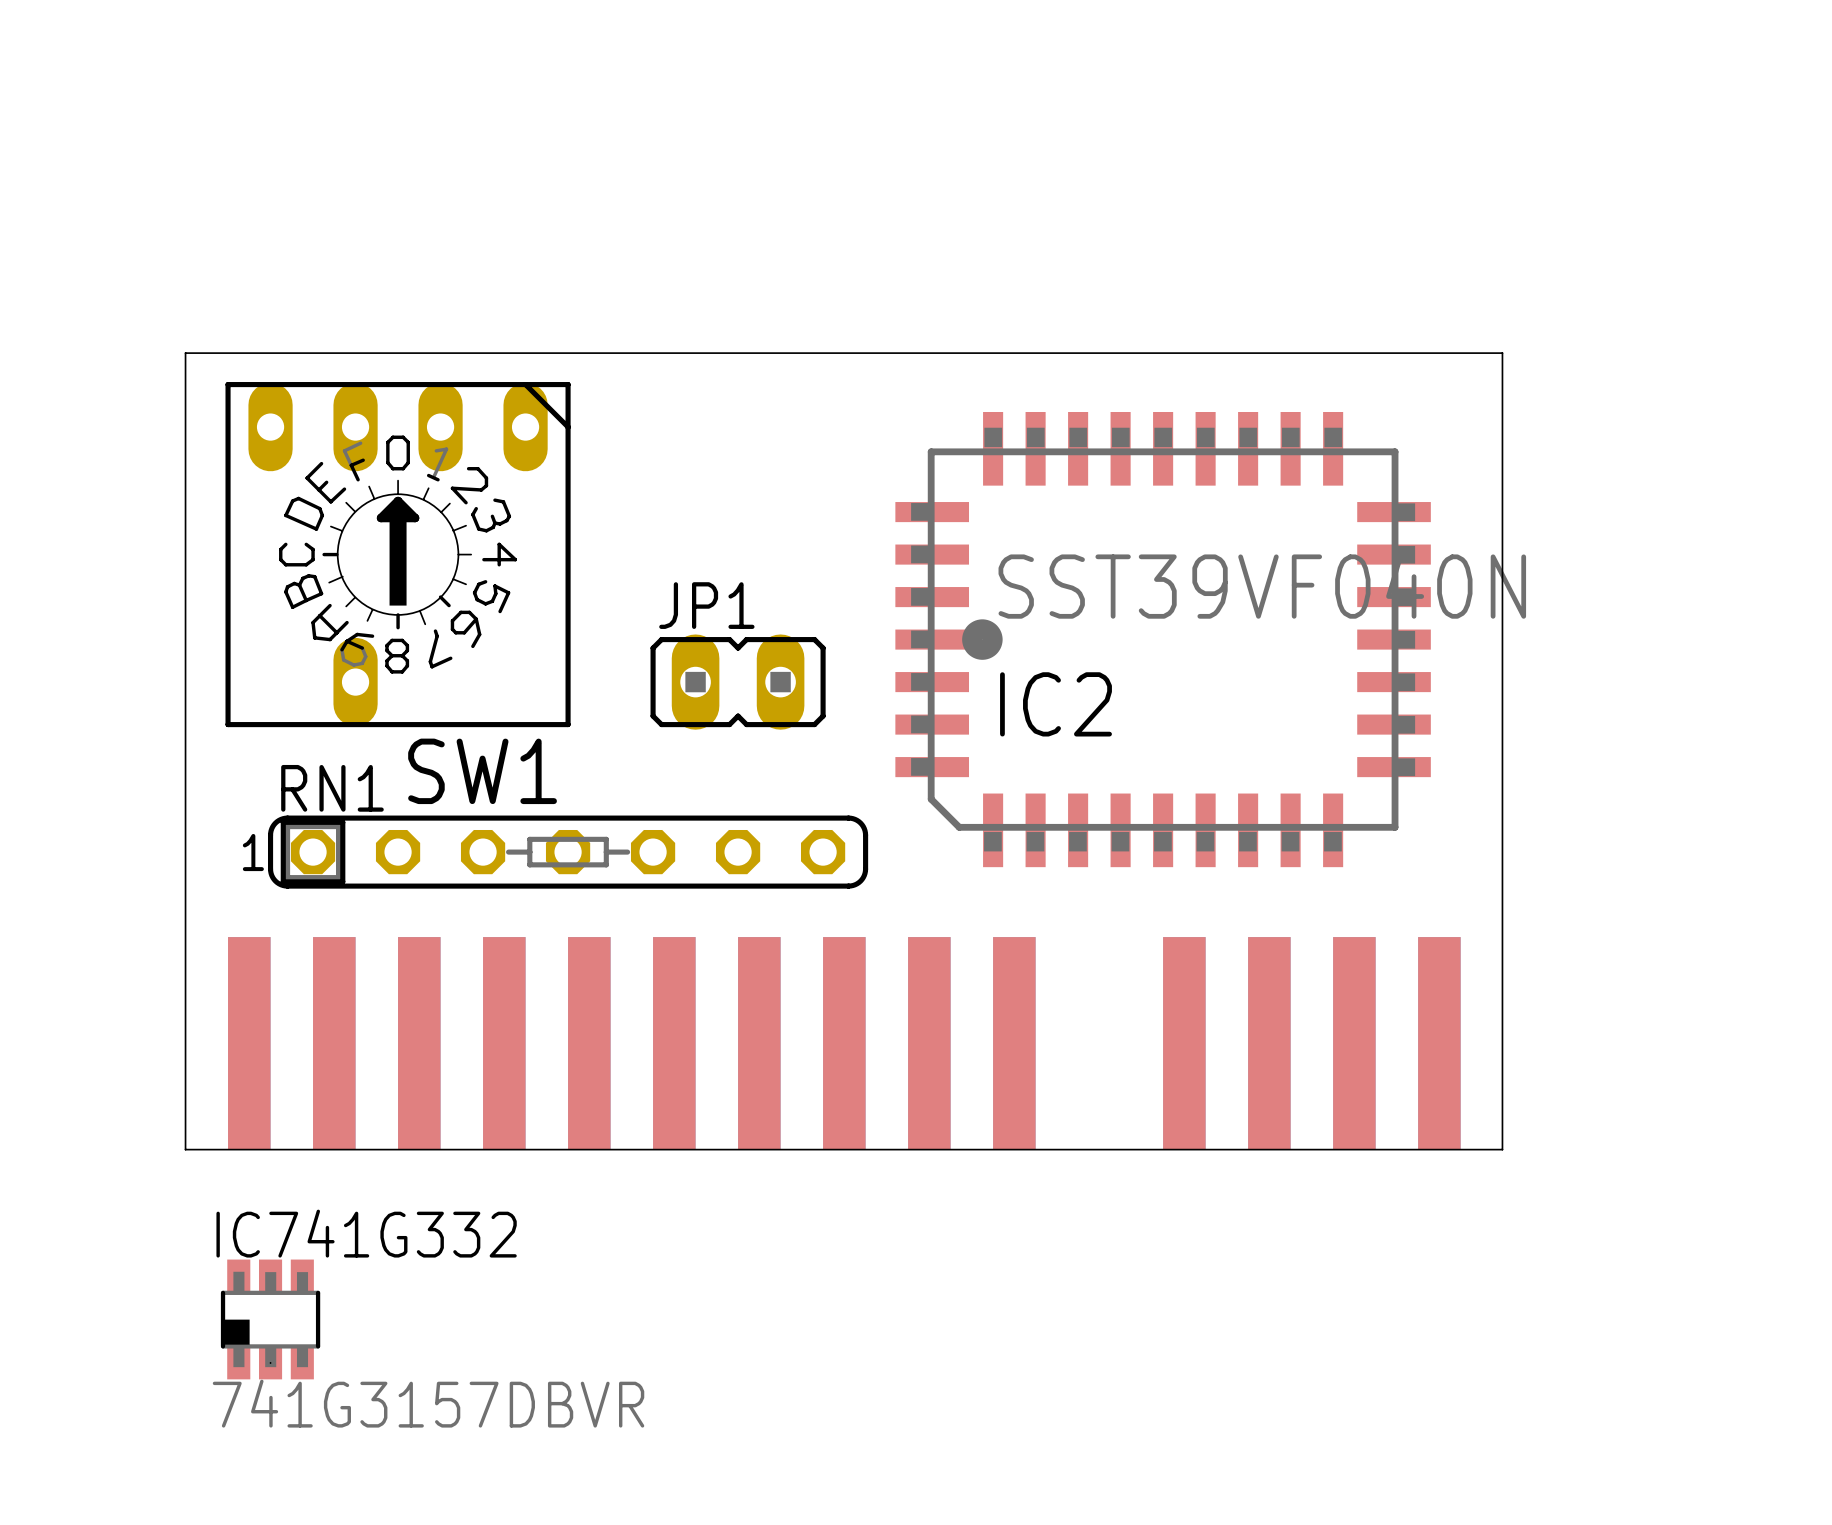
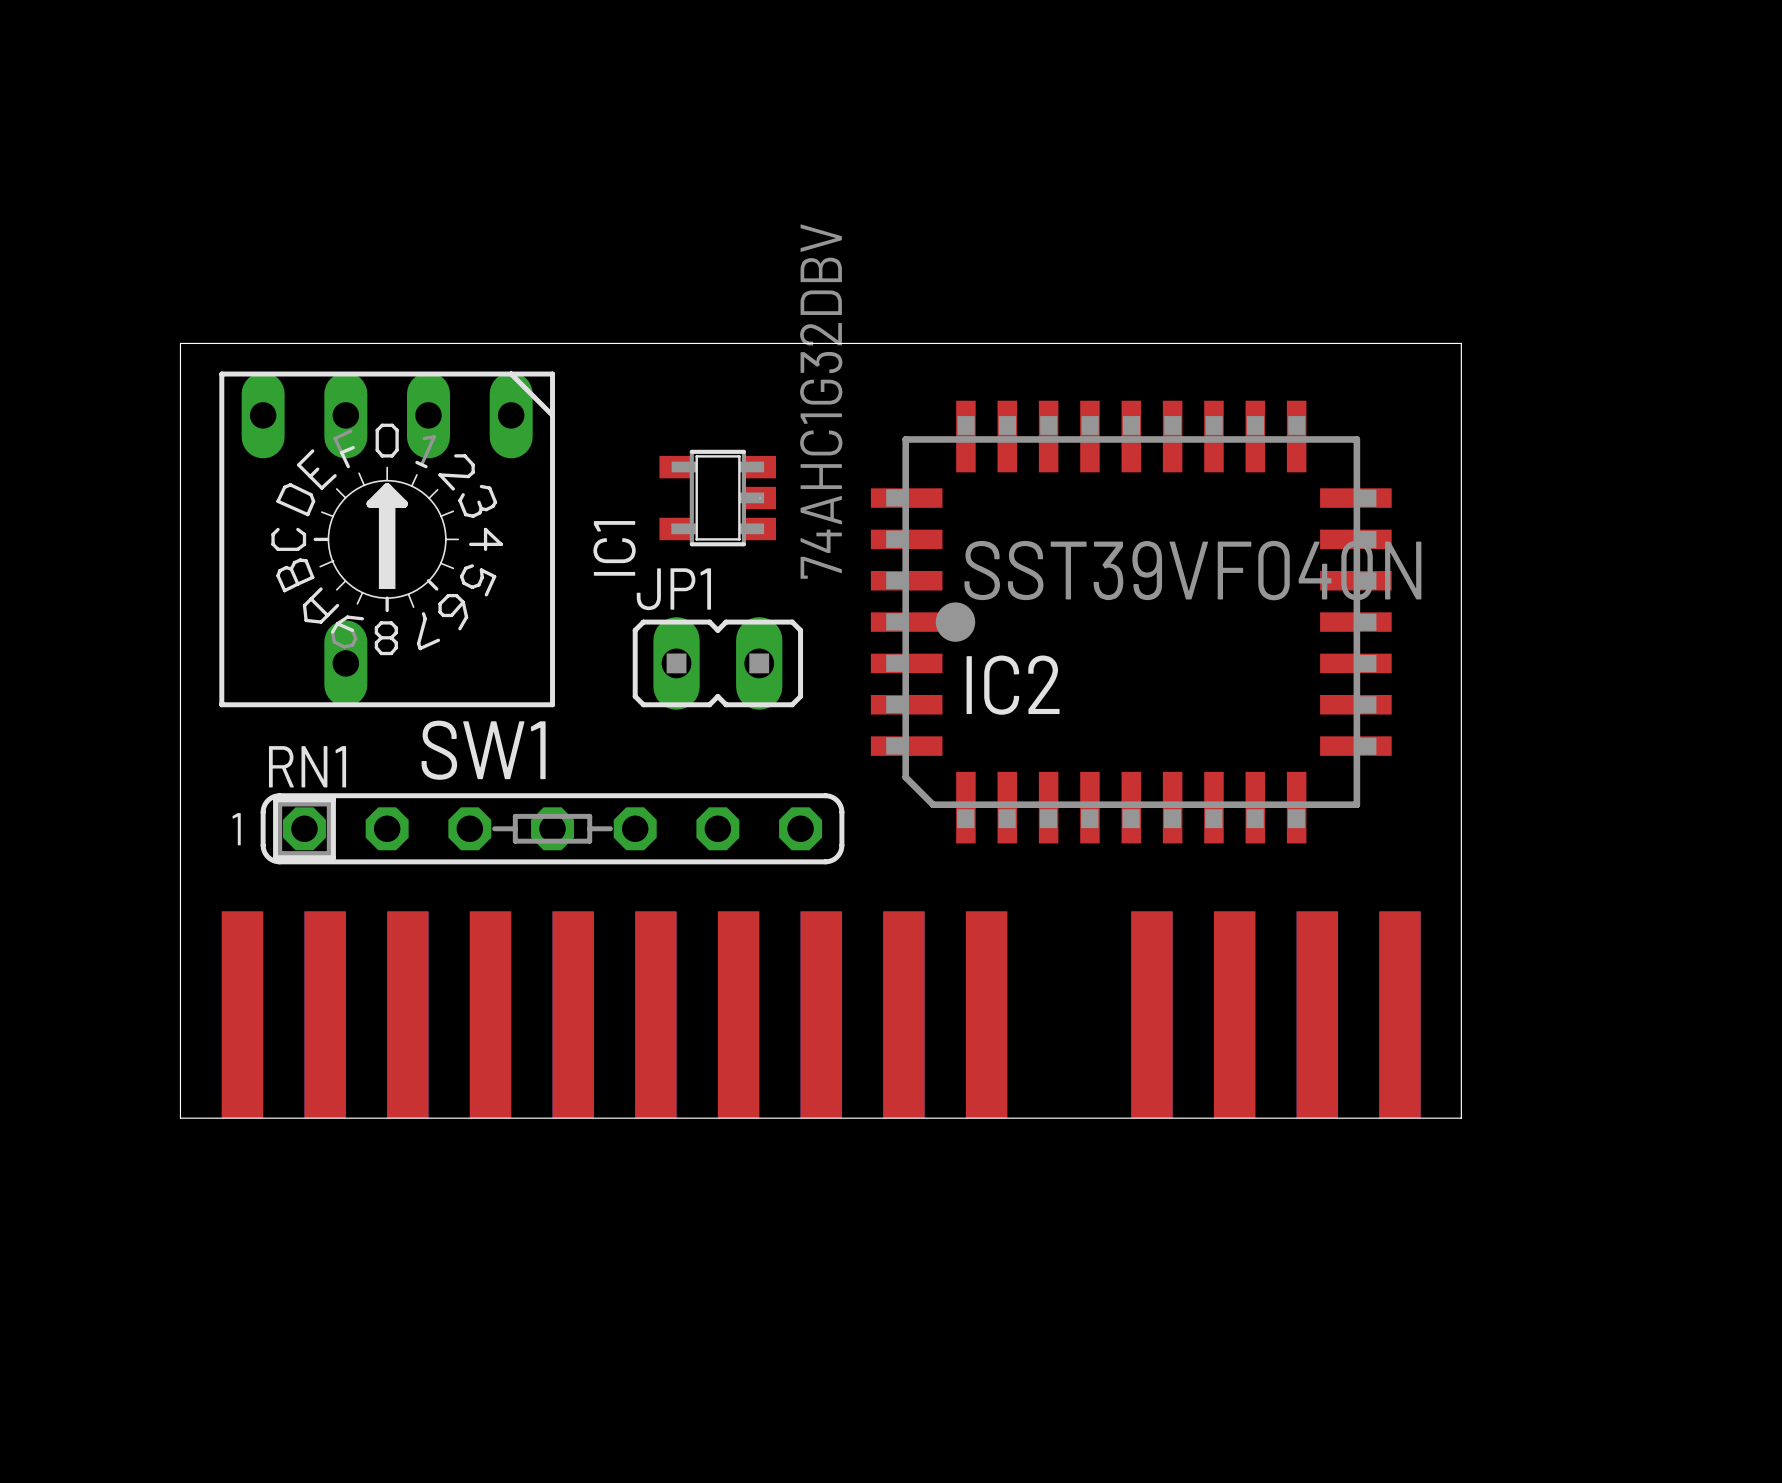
IC1: none -> 74AHC1G32DBV (717, 498)
IC741G332: 741G3157DBVR (270, 1319) -> none

